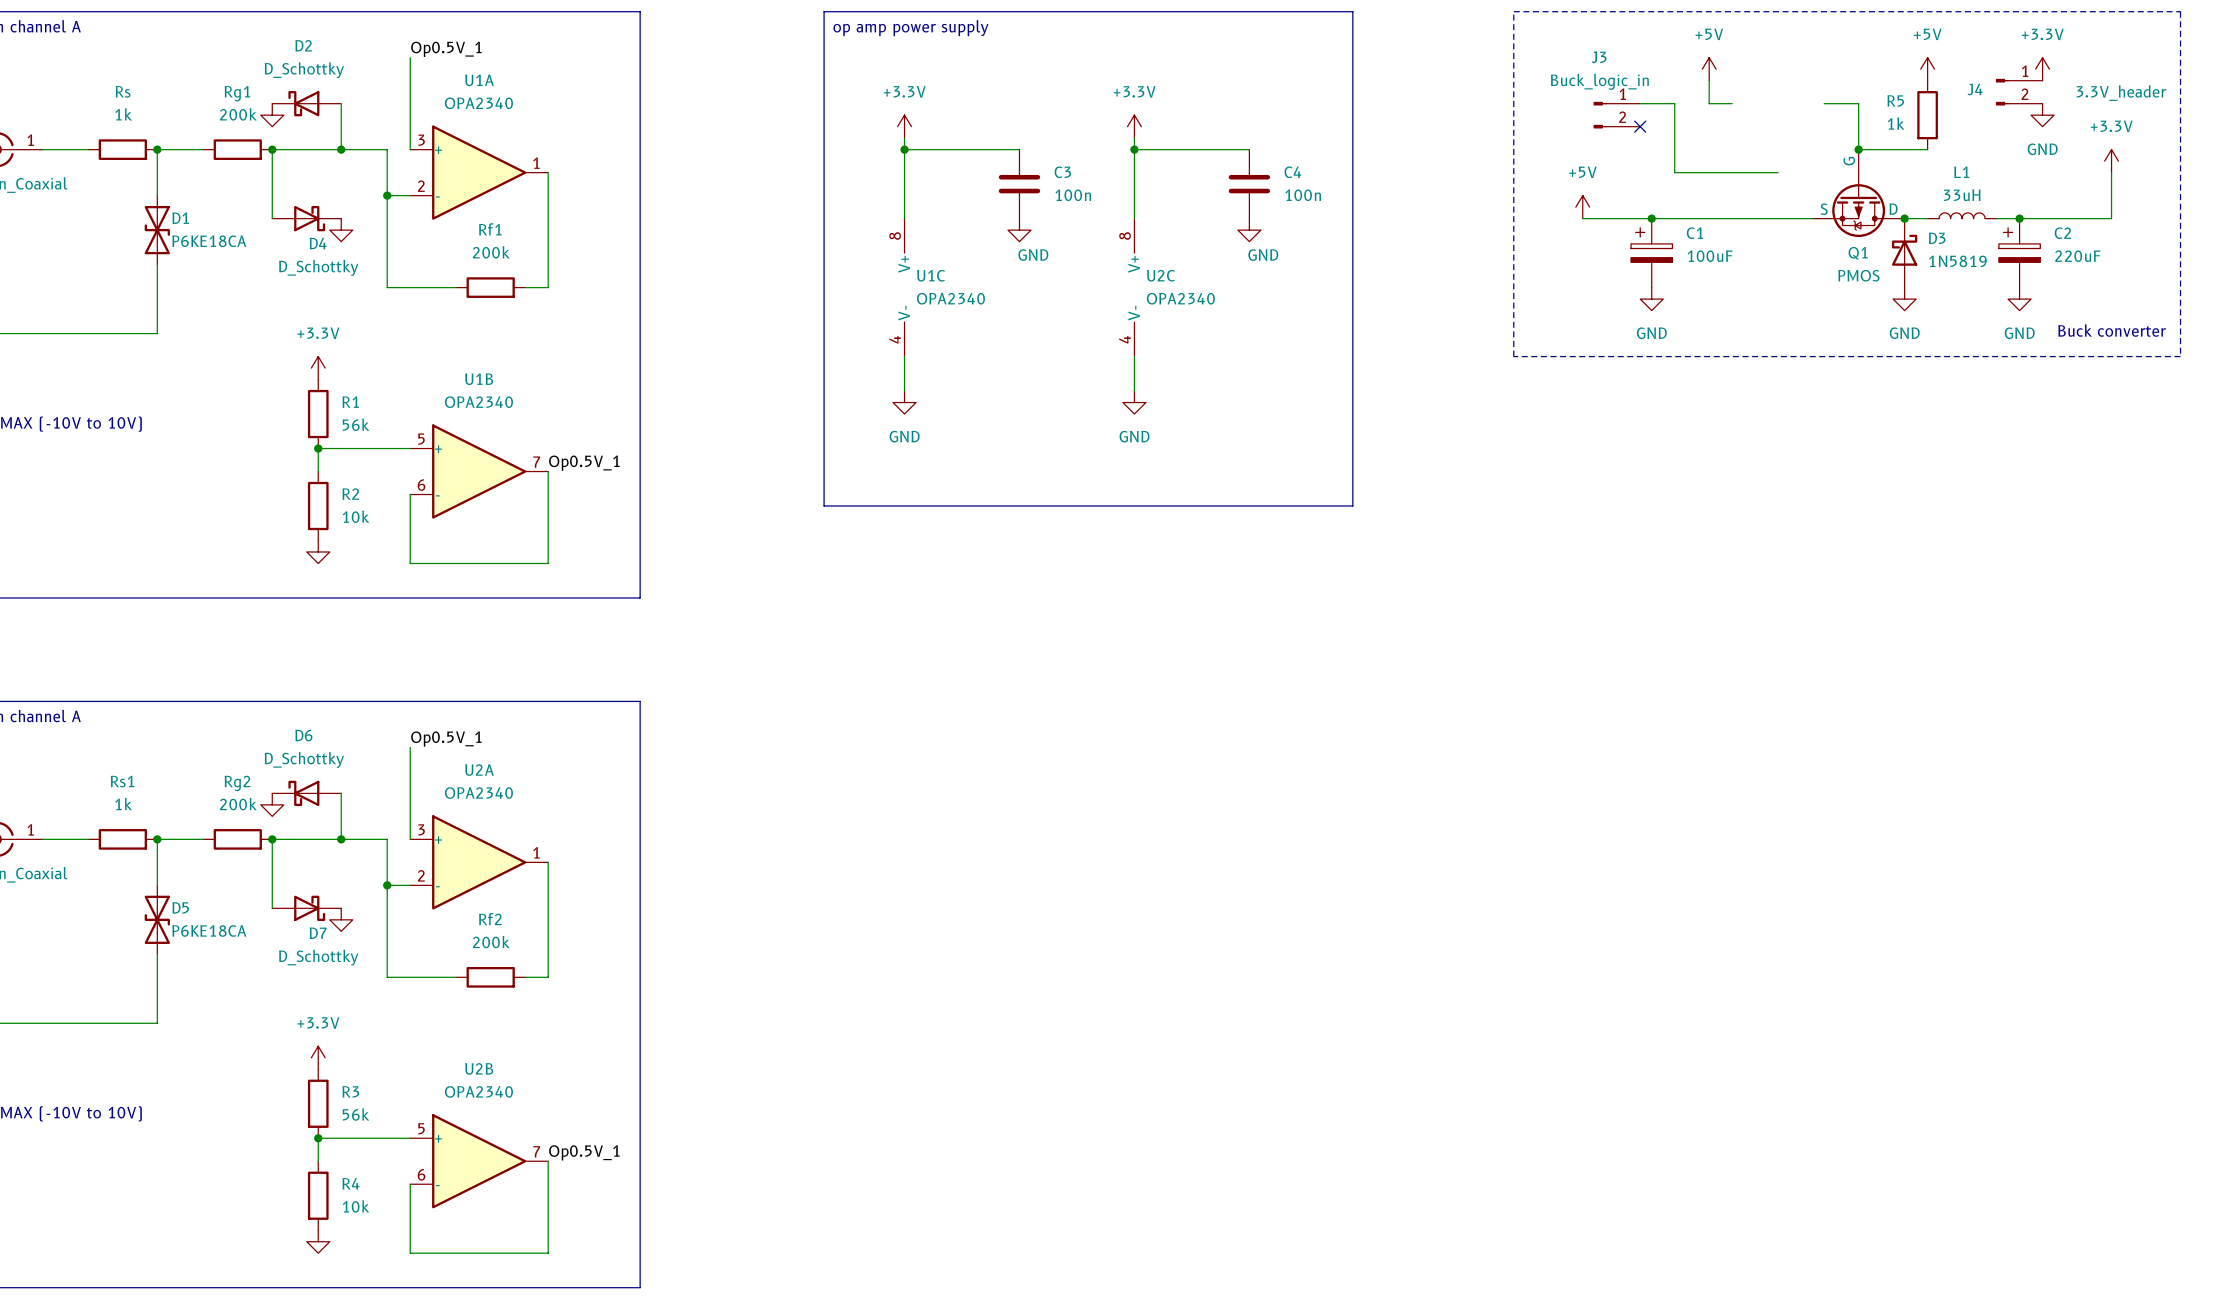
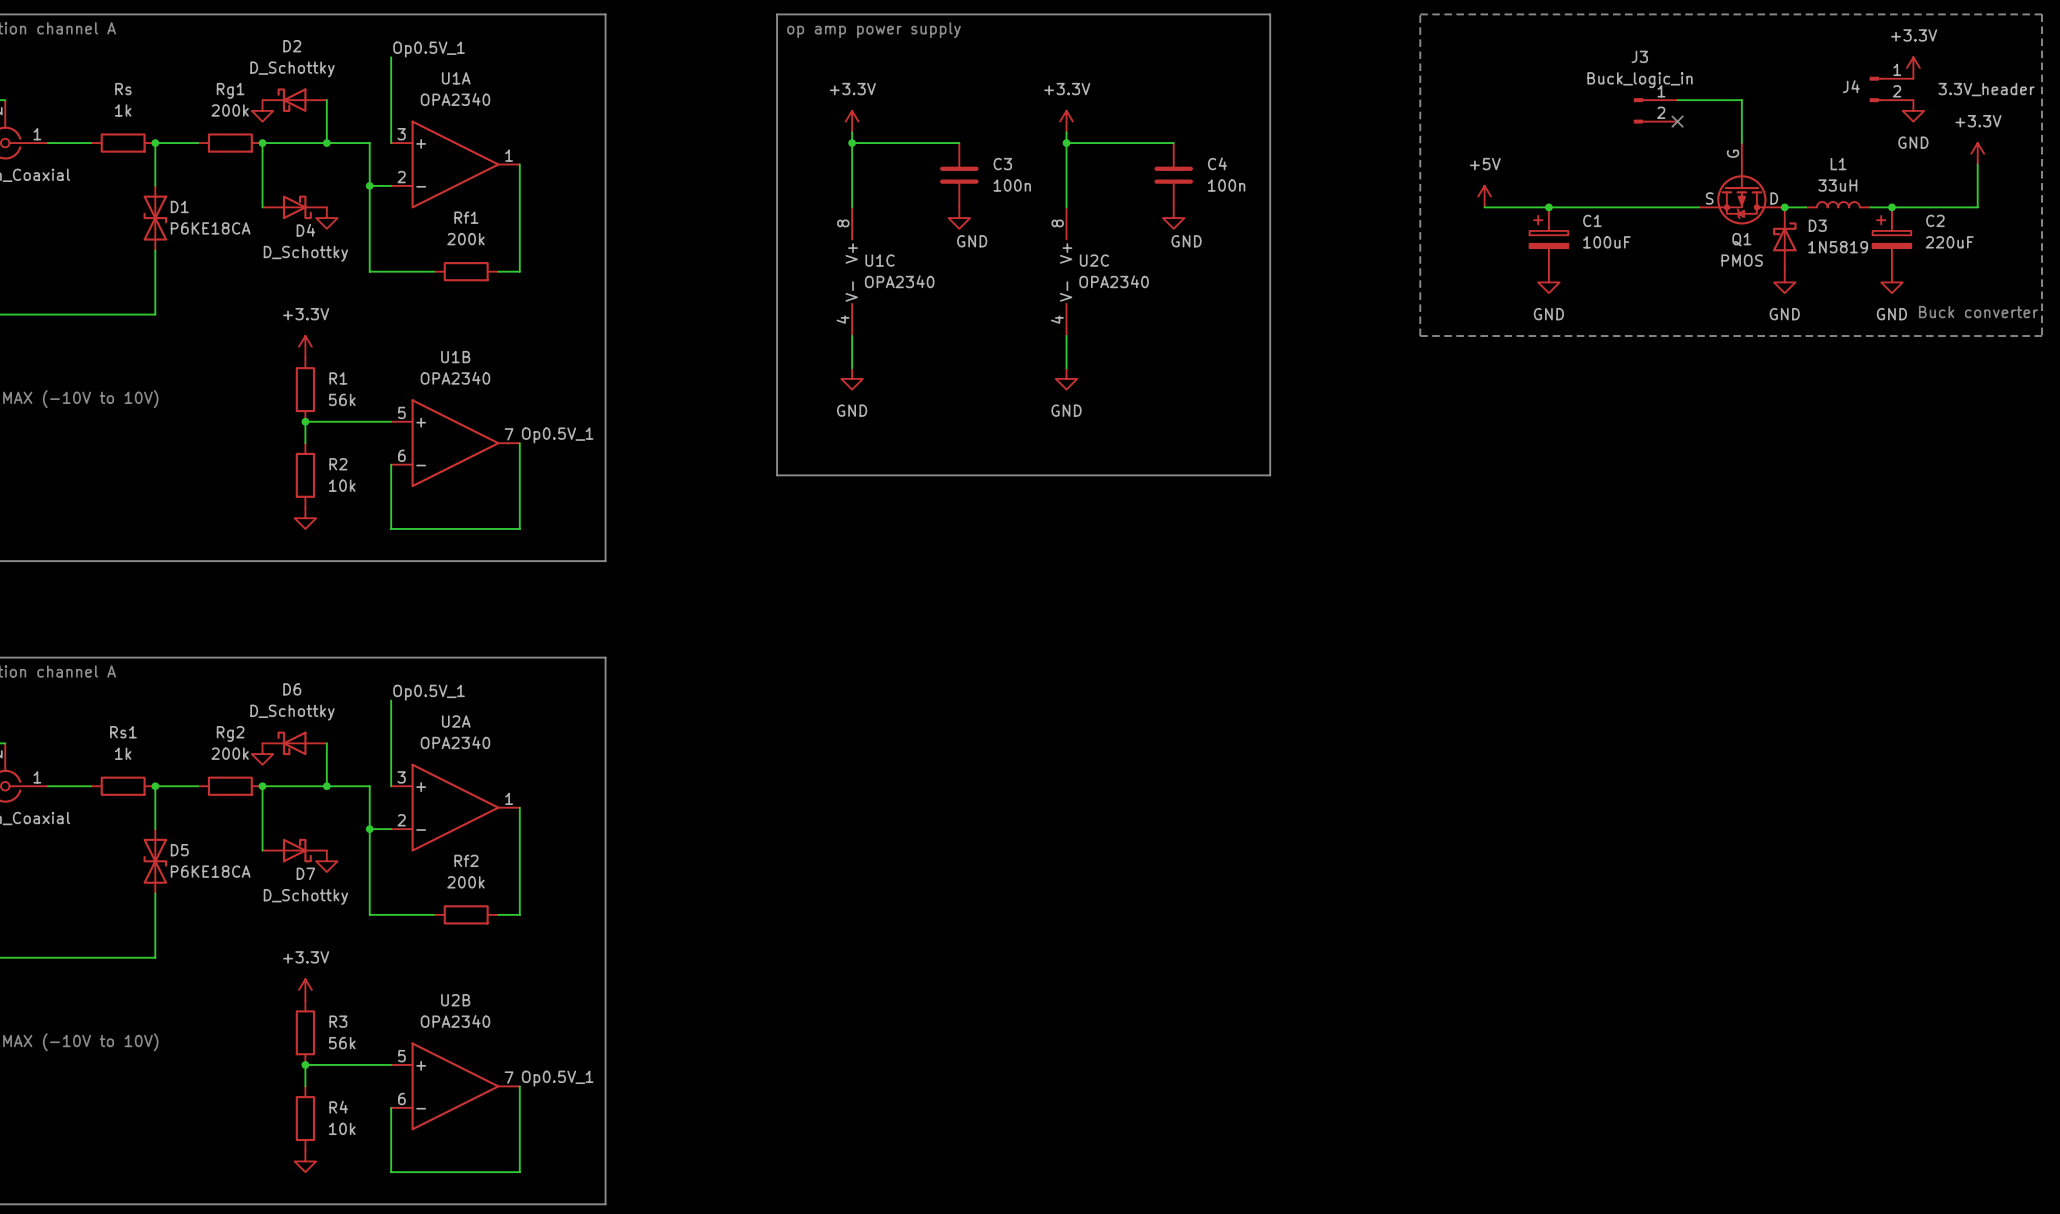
power symbol: +5V (1709, 69) -> none
power symbol: +5V (1927, 69) -> none
wire: (1709, 80) (1709, 103) (1732, 103) -> none
wire: (1640, 103) (1674, 103) (1674, 172) (1778, 172) -> none
wire: none -> (1677, 100) (1709, 100)
J3 position: (1616, 115) -> (1655, 110)
R5: 1k (1927, 115) -> none
no-connect mark: (1640, 126) -> none
no-connect mark: none -> (1677, 121)
wire: (1858, 149) (1927, 149) -> none
junction: (1858, 149) -> none

